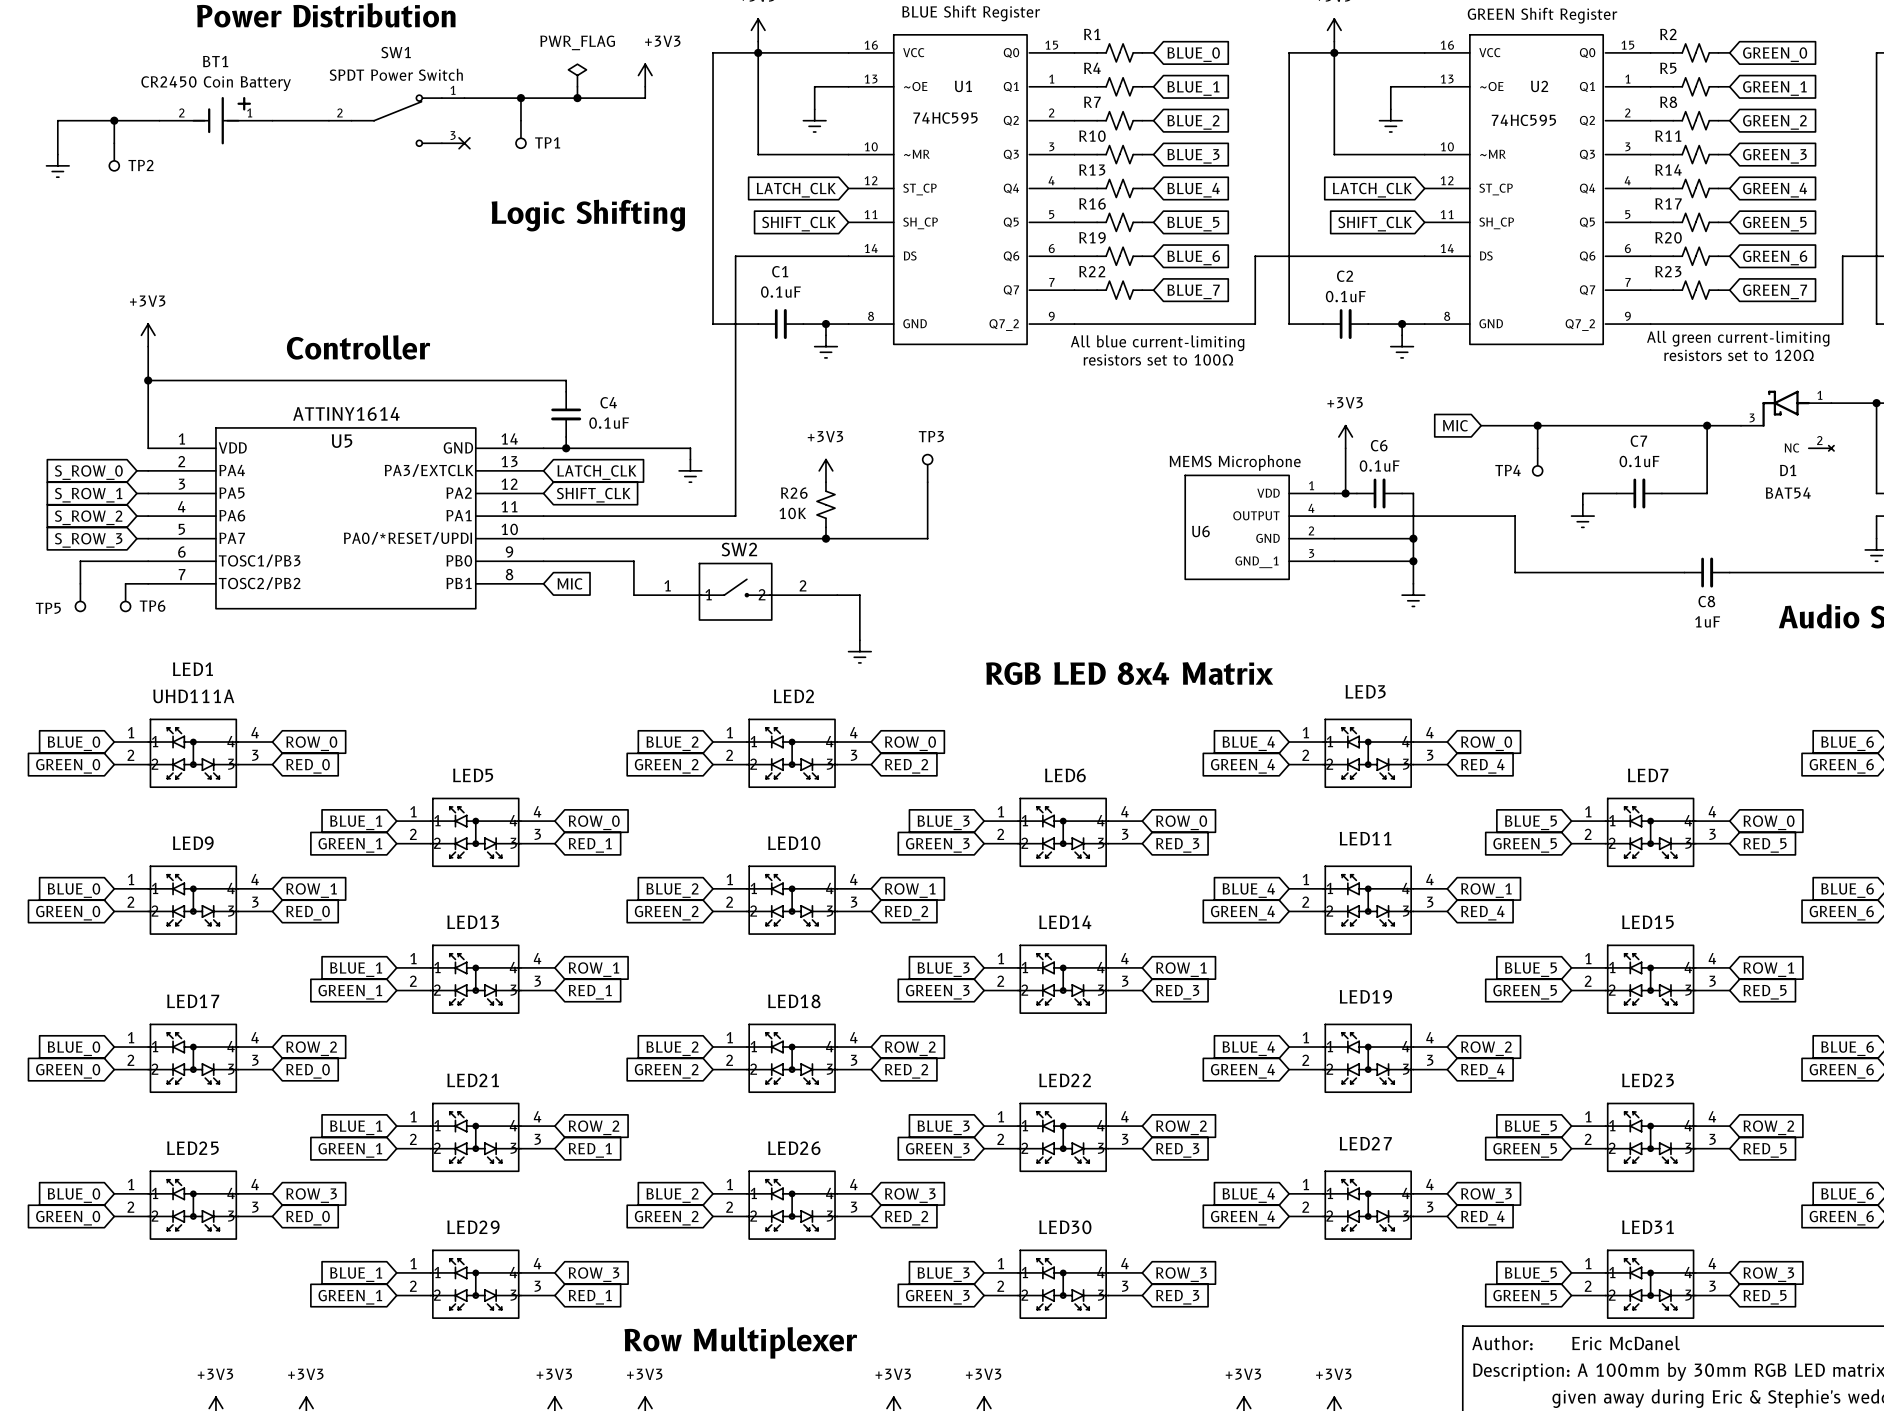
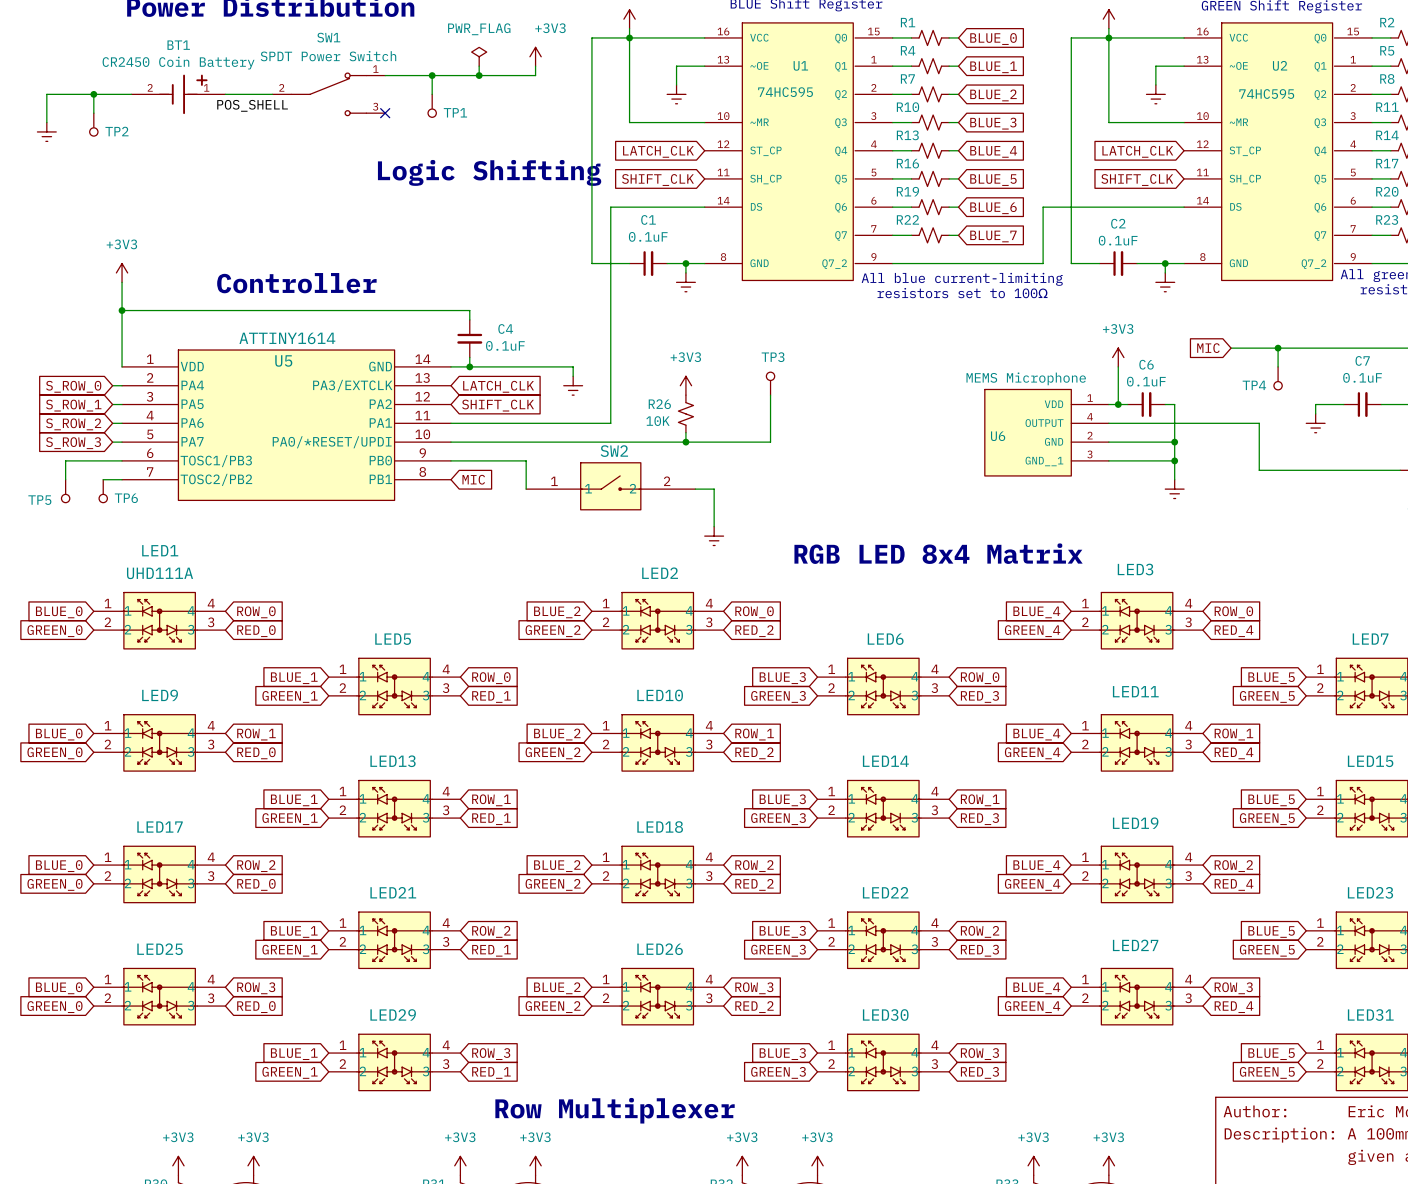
label: none -> POS_SHELL (252, 105)

